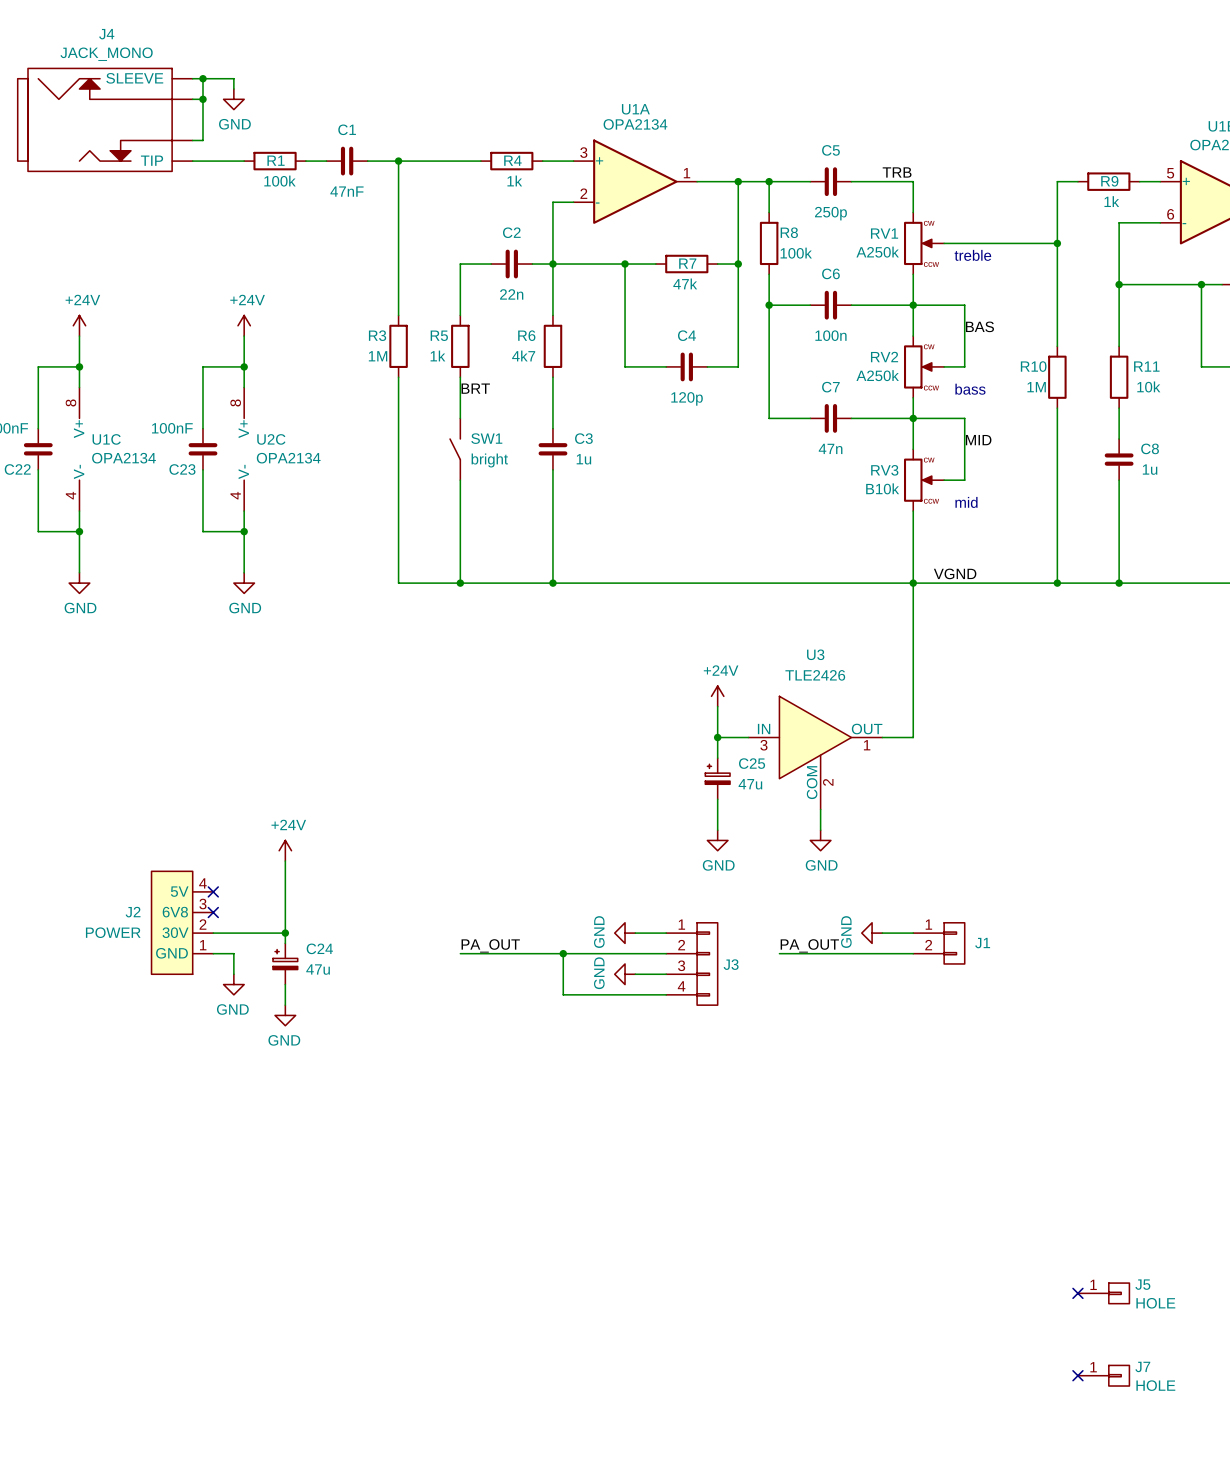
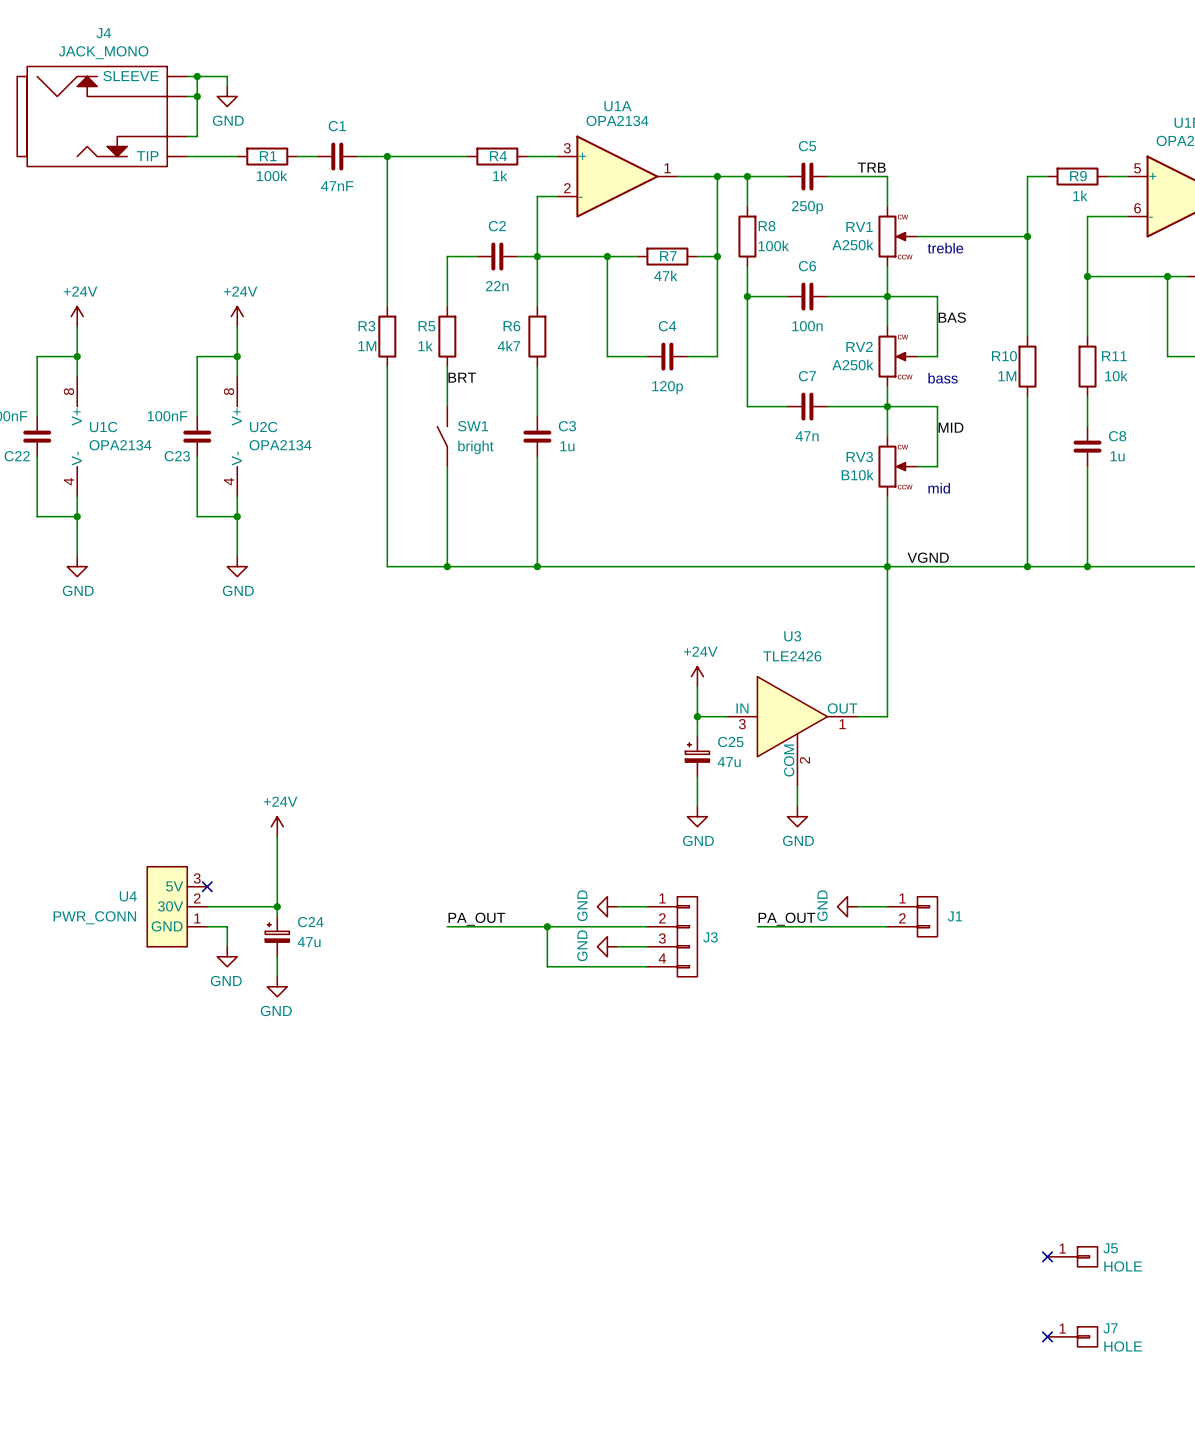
no-connect mark: (213, 891) -> none
J2: POWER (182, 922) -> none
U4: none -> PWR_CONN (177, 906)

